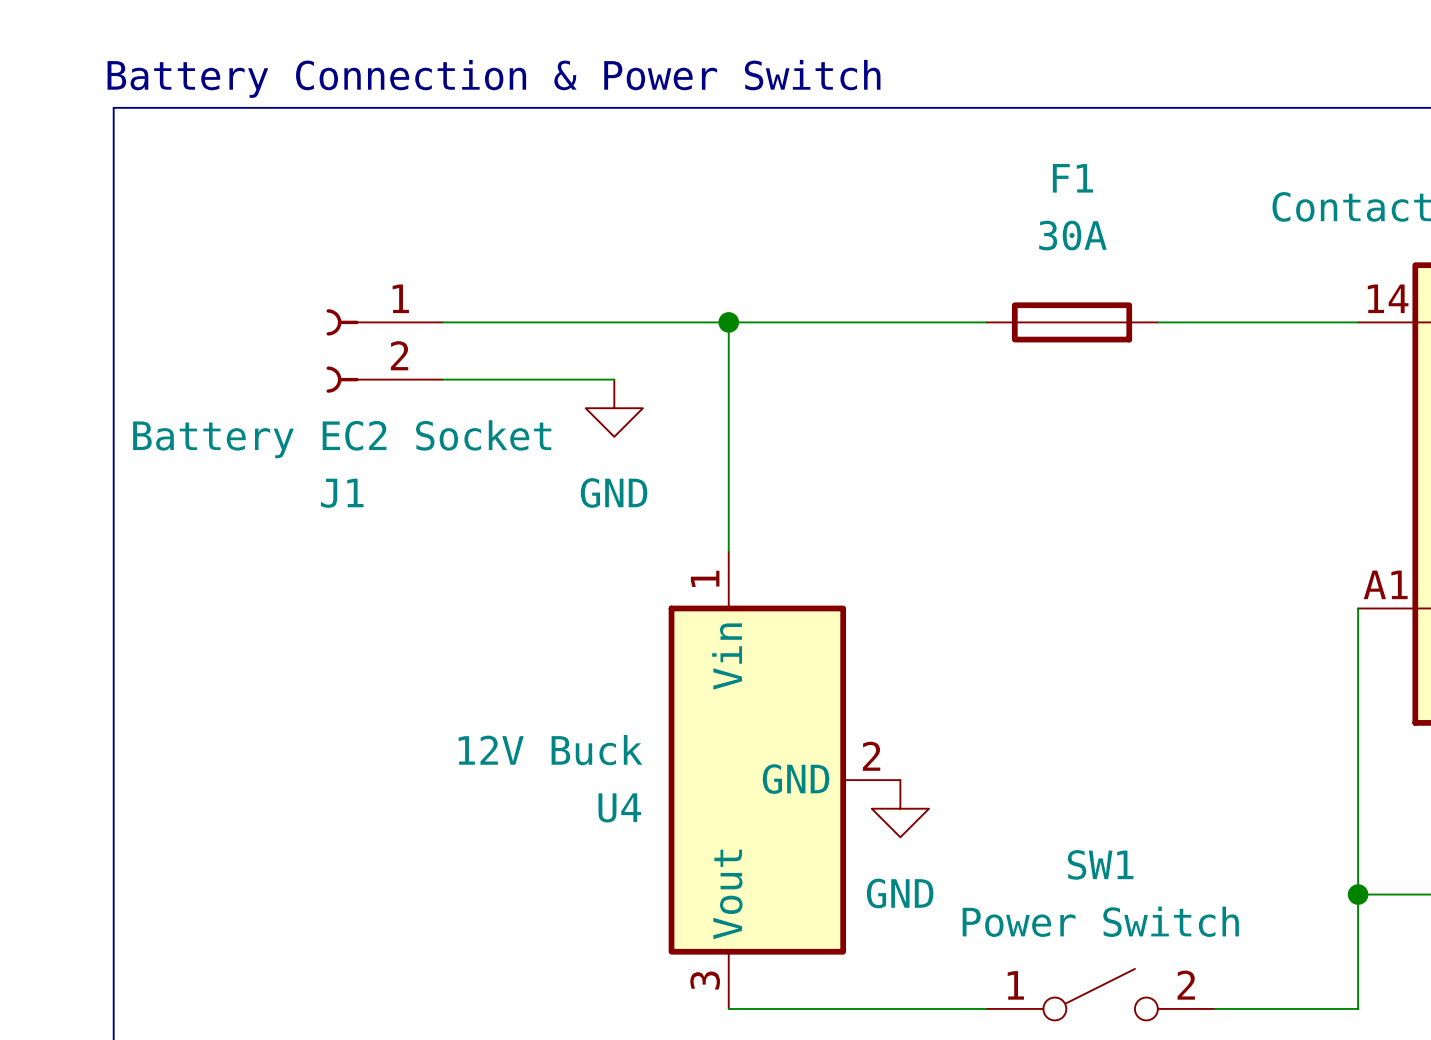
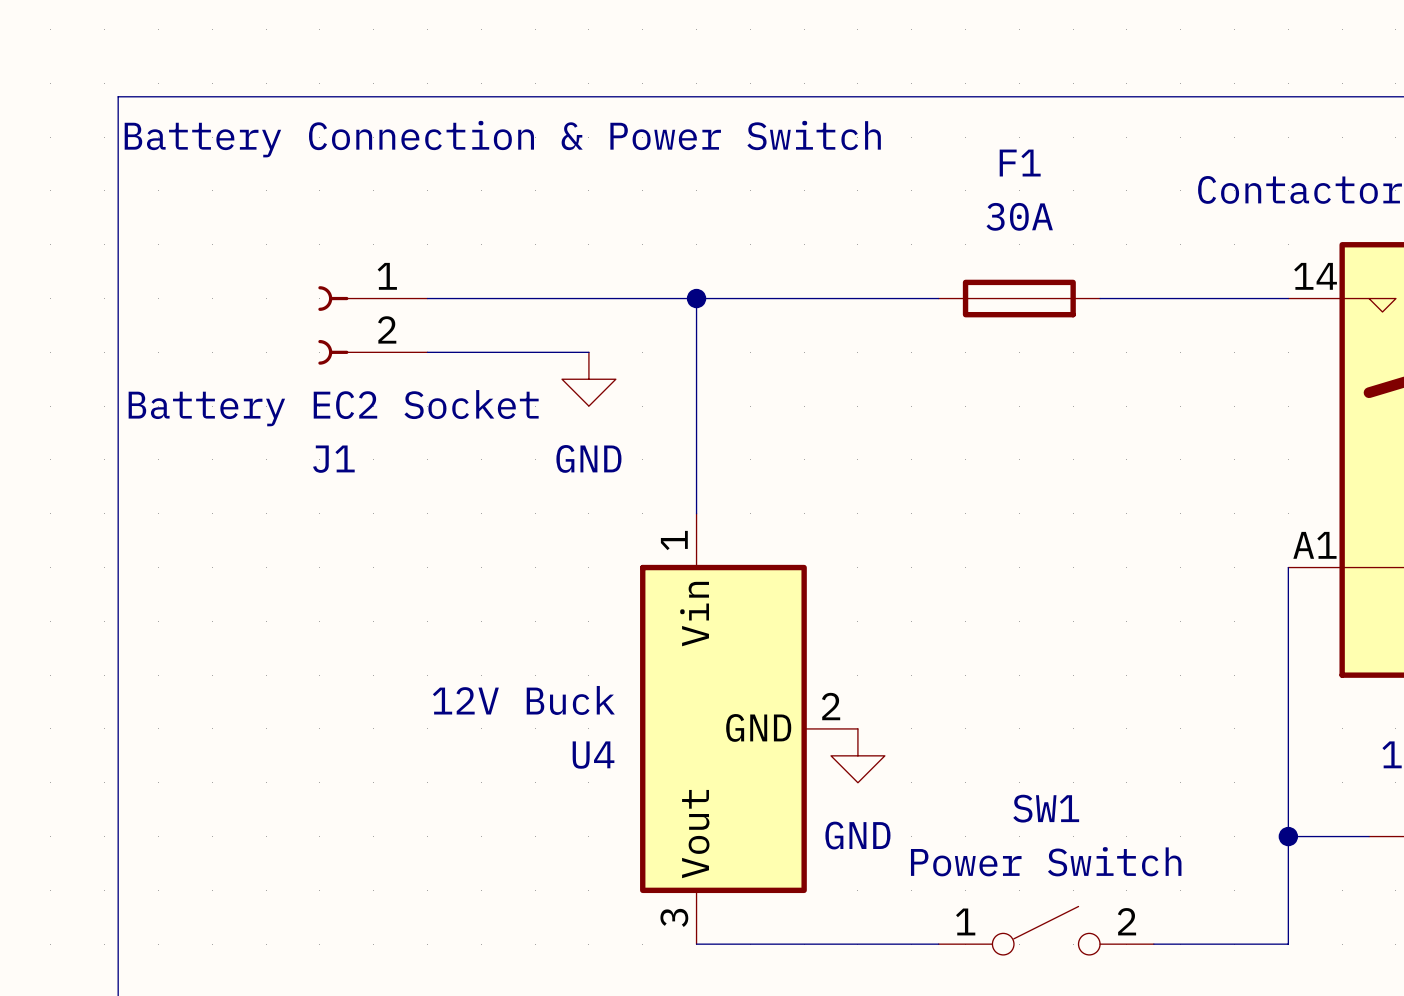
text position: Battery Connection & Power Switch (494, 78) -> Battery Connection & Power Switch (502, 139)

